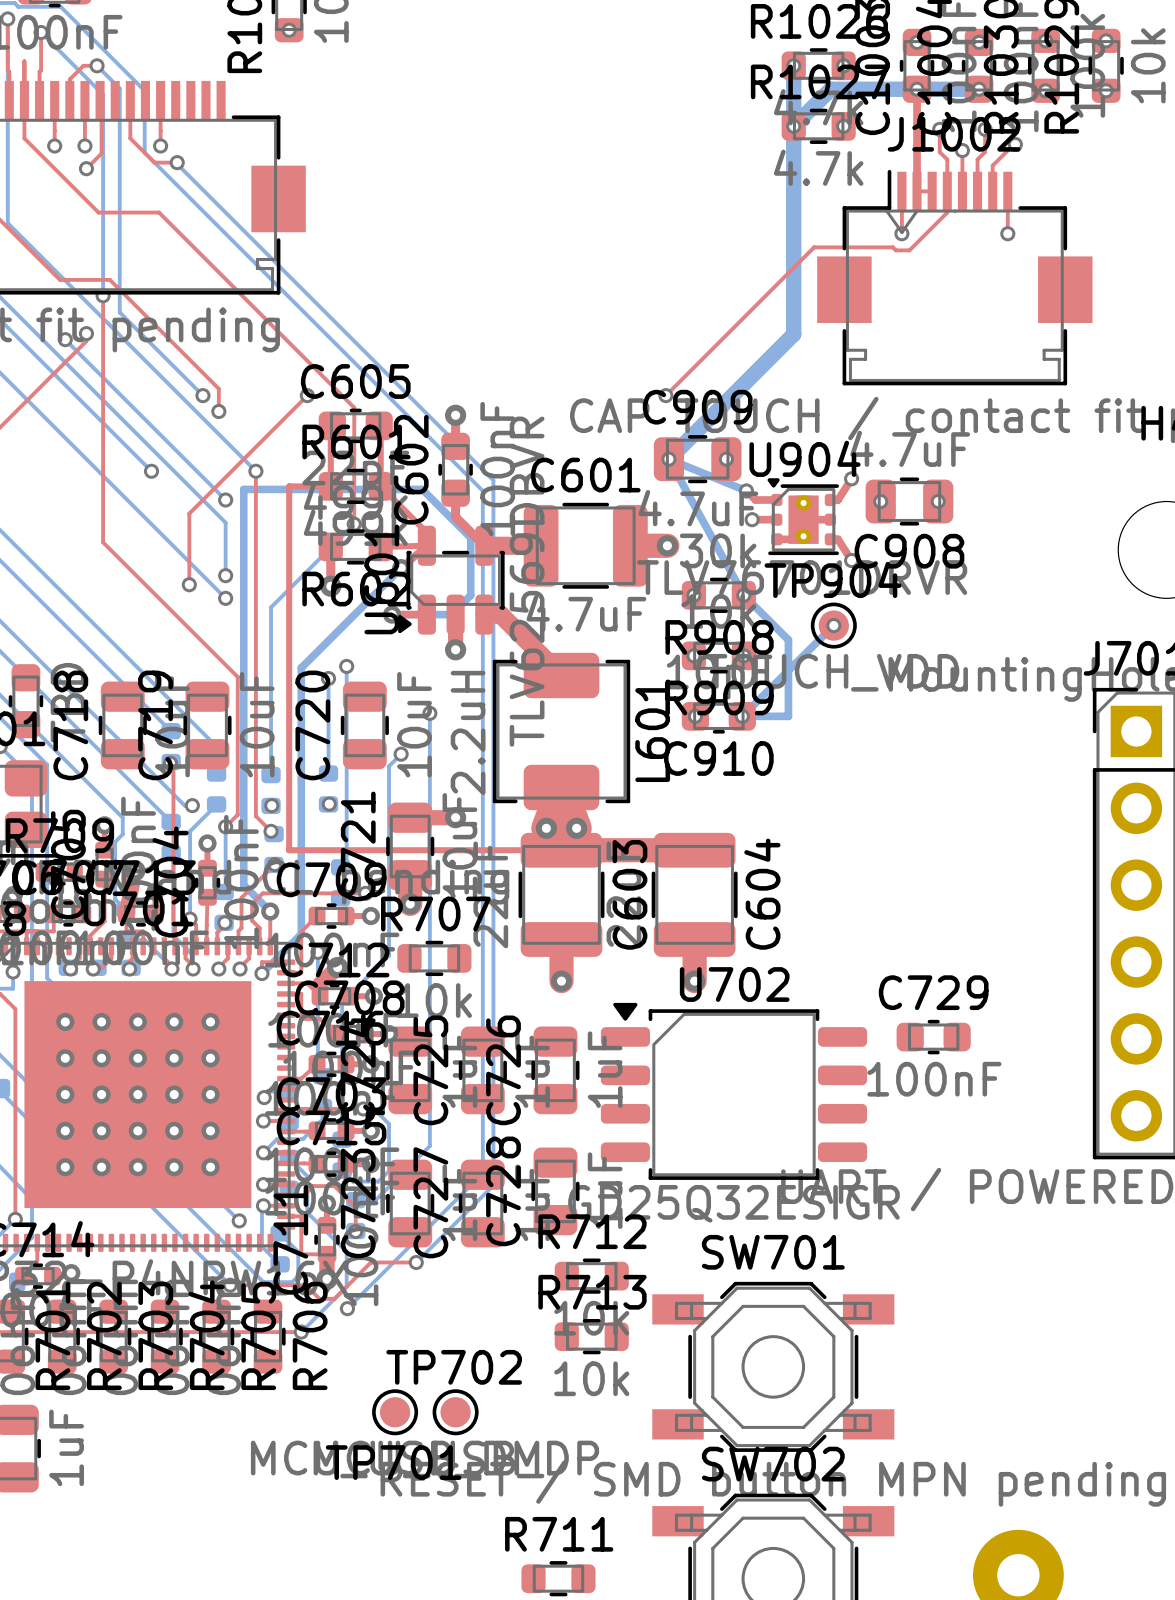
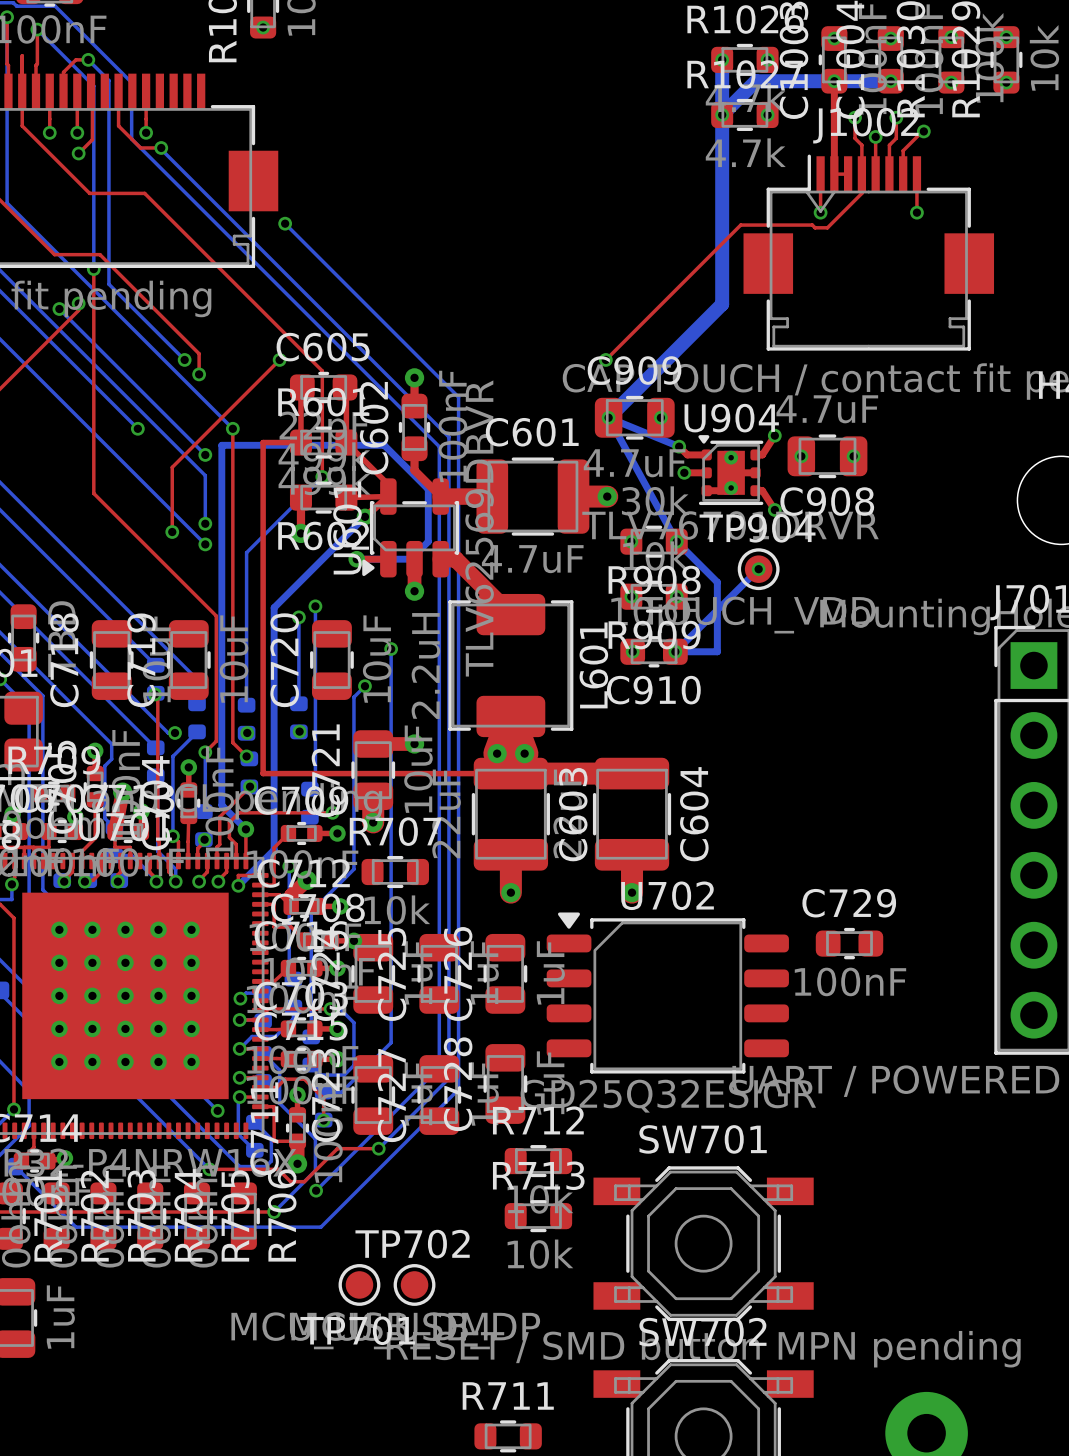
bottom track: none -> (285, 223) (458, 397) (458, 1089) (320, 1227) (75, 1227) (15, 1166)
via: none -> (285, 223)

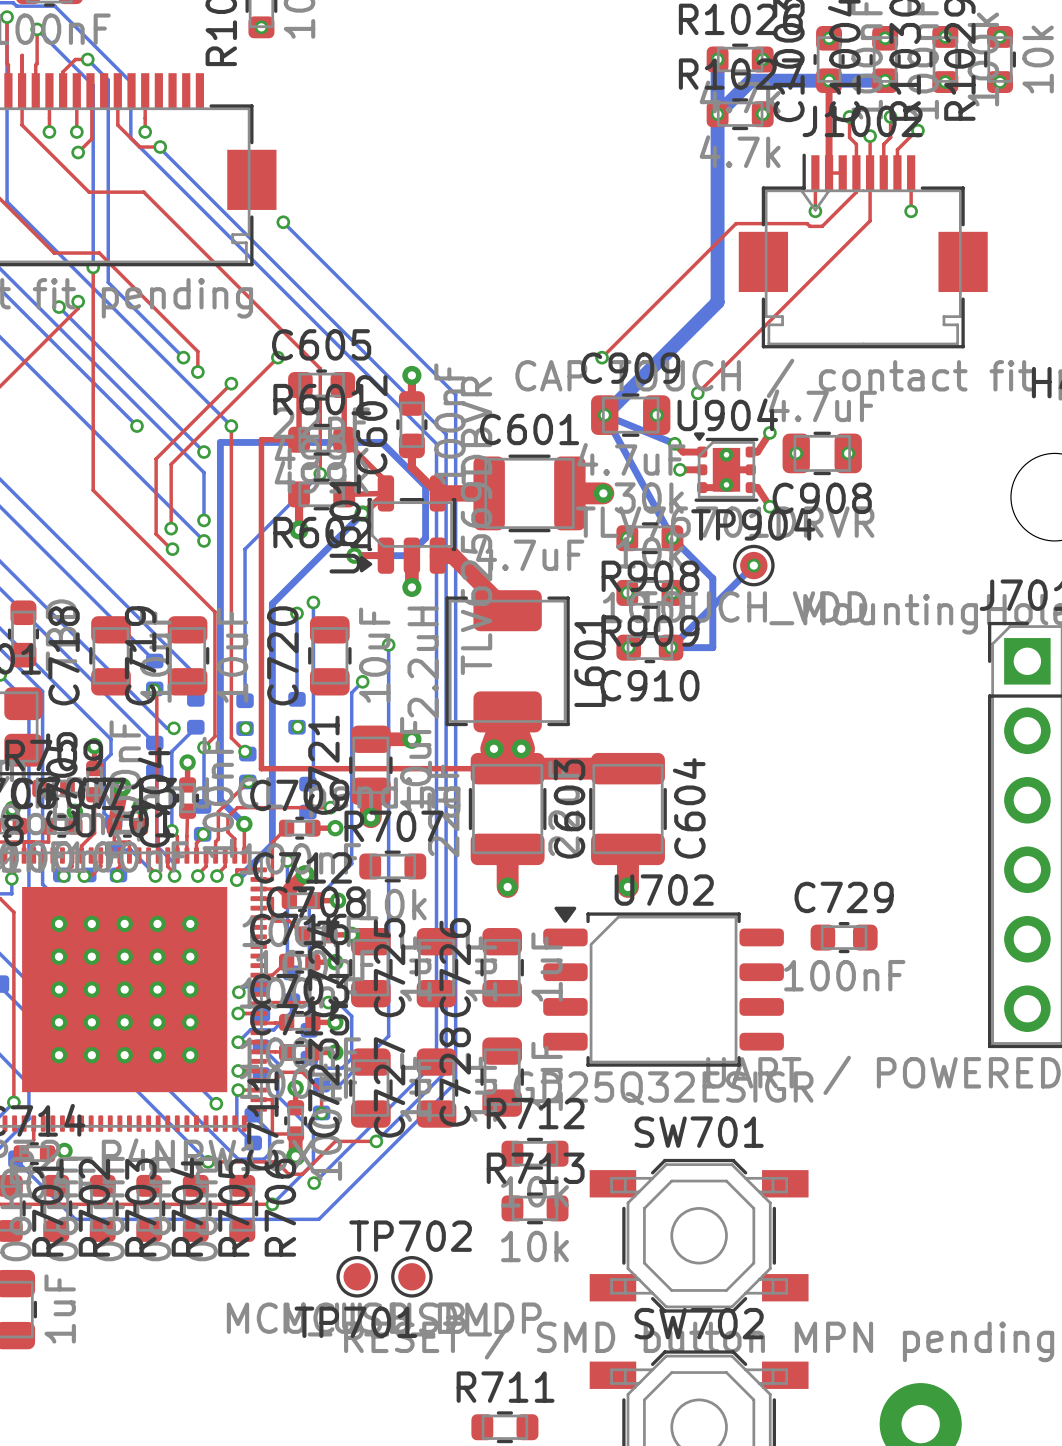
top track: none -> (870, 173) (870, 220) (697, 393)
top track: none -> (231, 383) (156, 458) (156, 534) (172, 549)
via: none -> (231, 383)
via: none -> (697, 393)
via: none -> (172, 549)

